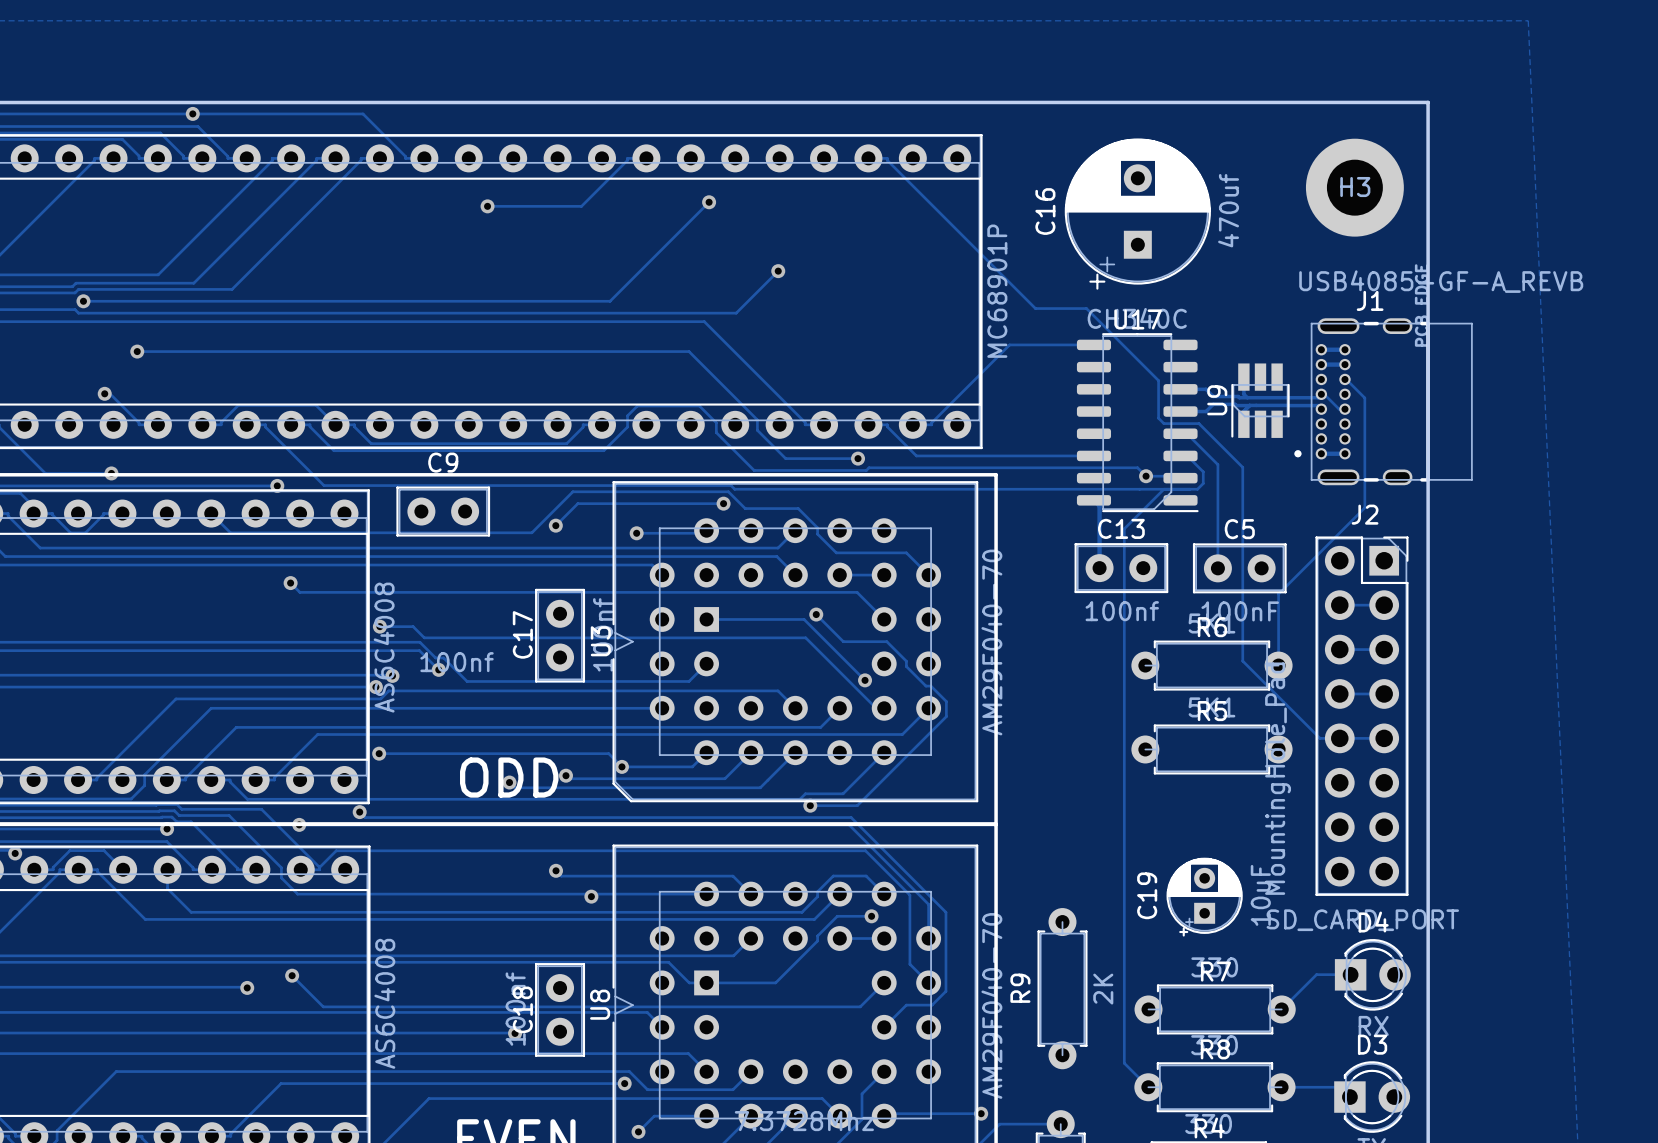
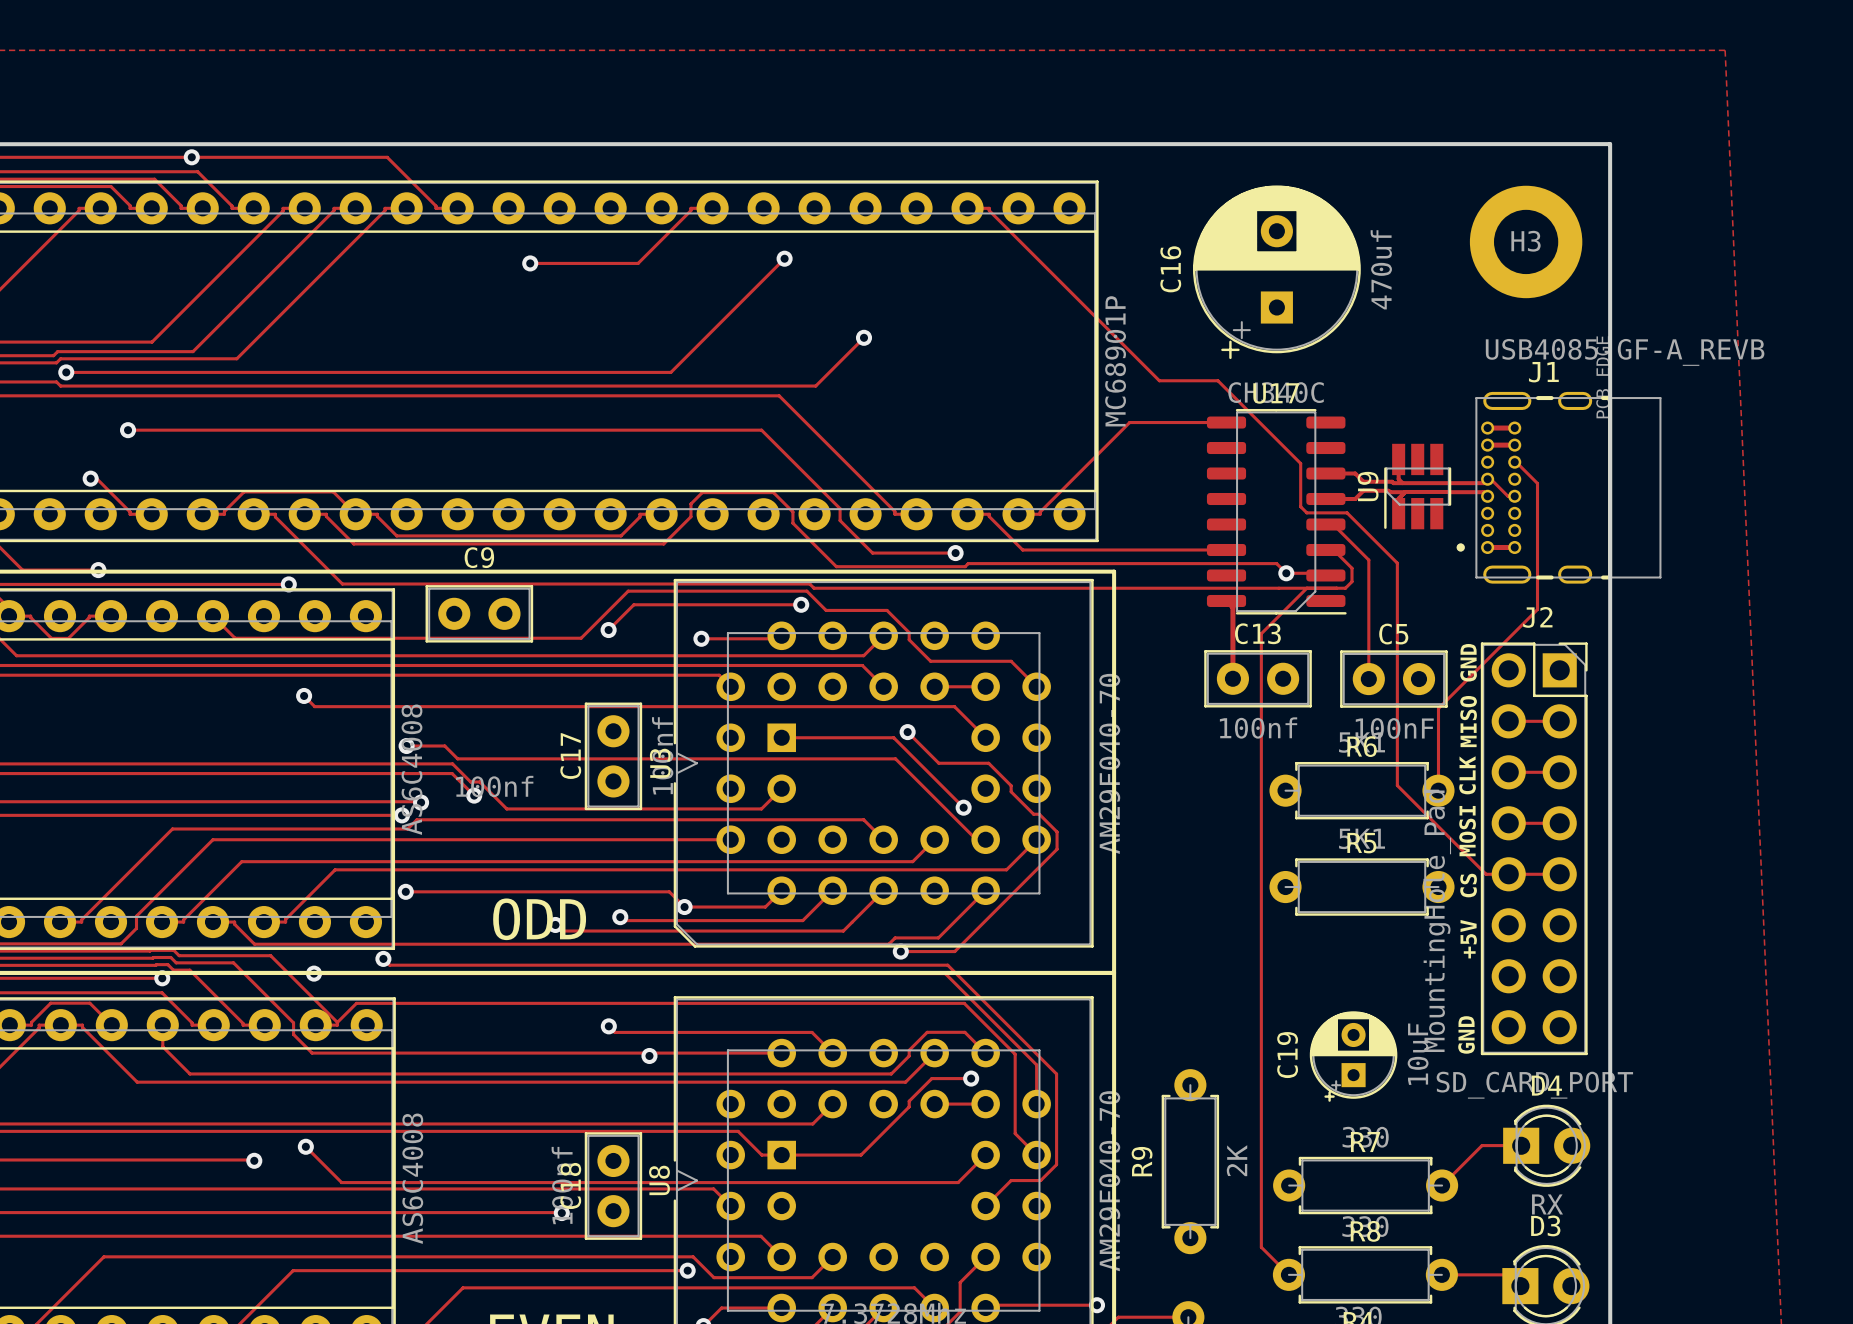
text: none -> GND (1468, 662)
text: none -> MISO (1468, 721)
text: none -> CLK (1467, 775)
text: none -> MOSI (1467, 831)
text: none -> CS (1468, 885)
text: none -> +5V (1468, 939)
text: none -> GND (1466, 1034)

